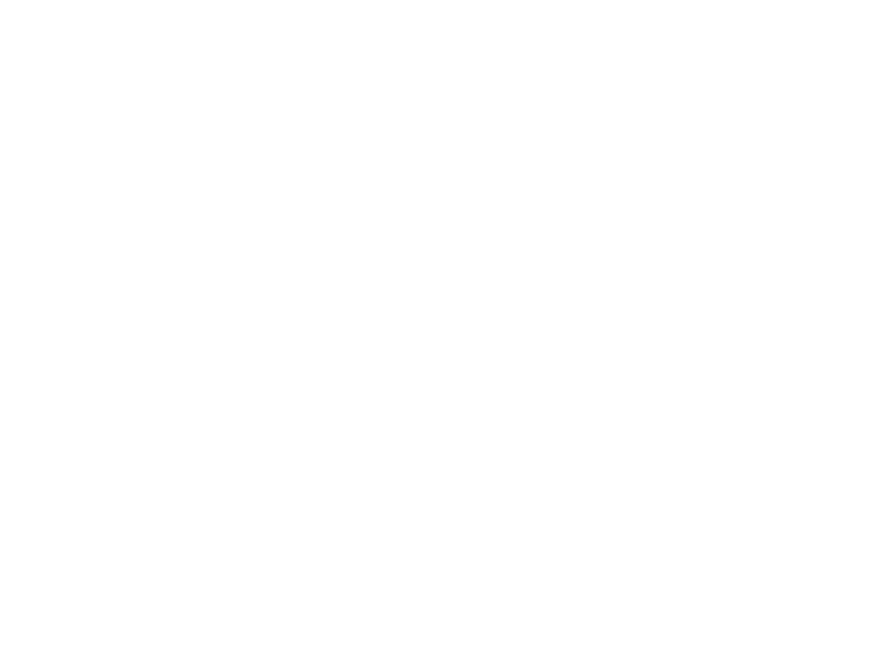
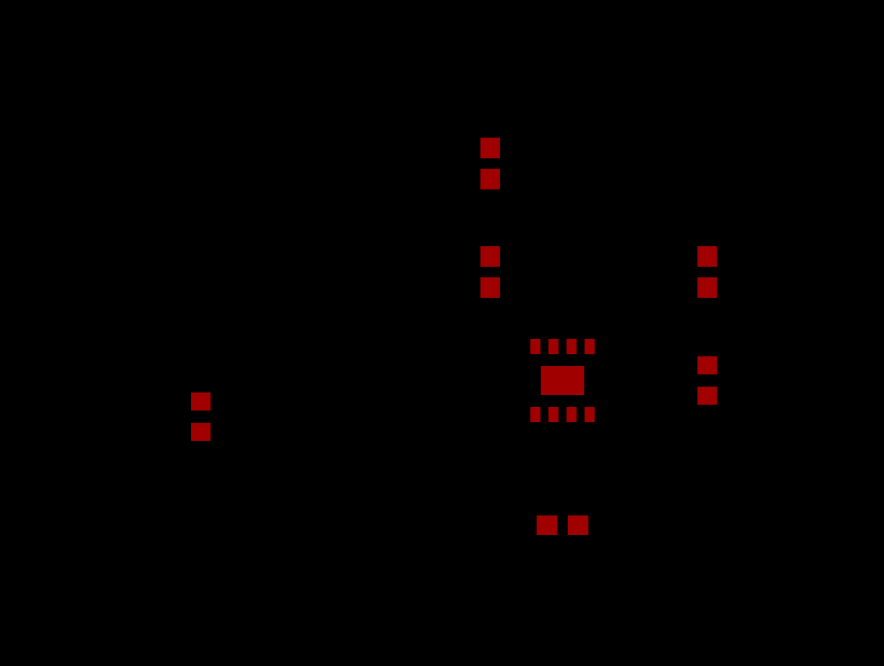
part: none -> (490, 163)
part: none -> (490, 272)
part: none -> (707, 272)
part: none -> (562, 380)
part: none -> (707, 380)
part: none -> (200, 416)
part: none -> (562, 525)

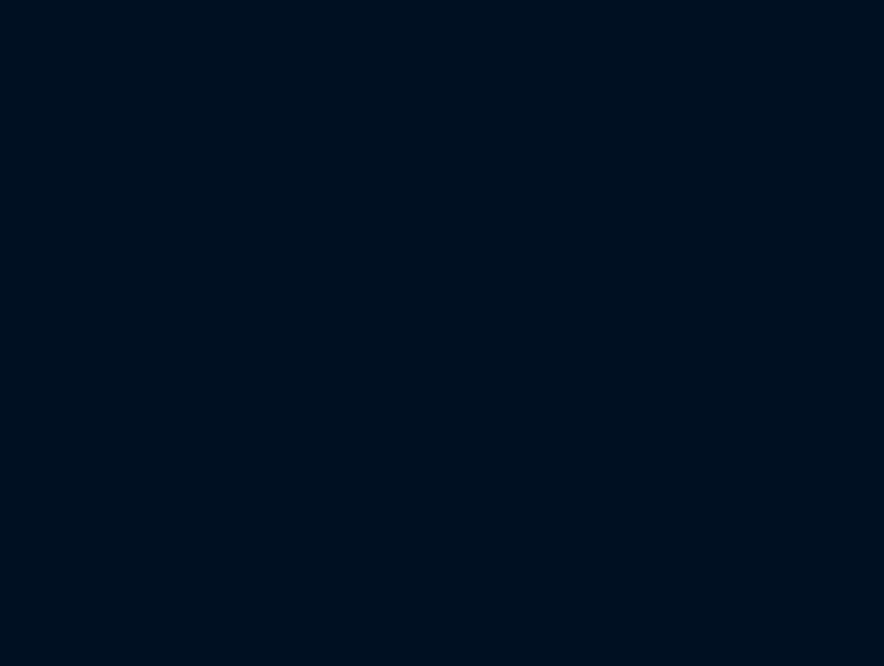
part: (490, 163) -> none
part: (490, 272) -> none
part: (707, 272) -> none
part: (562, 380) -> none
part: (707, 380) -> none
part: (200, 416) -> none
part: (562, 525) -> none

